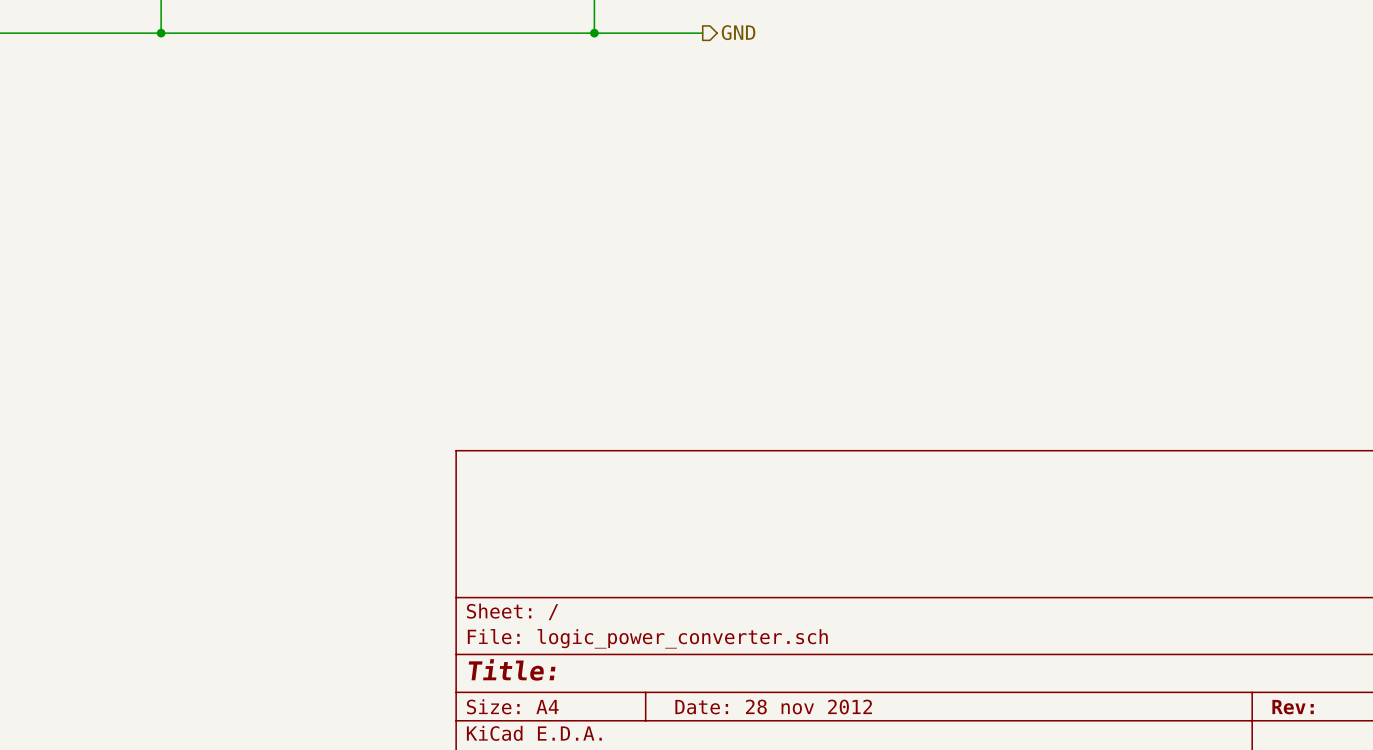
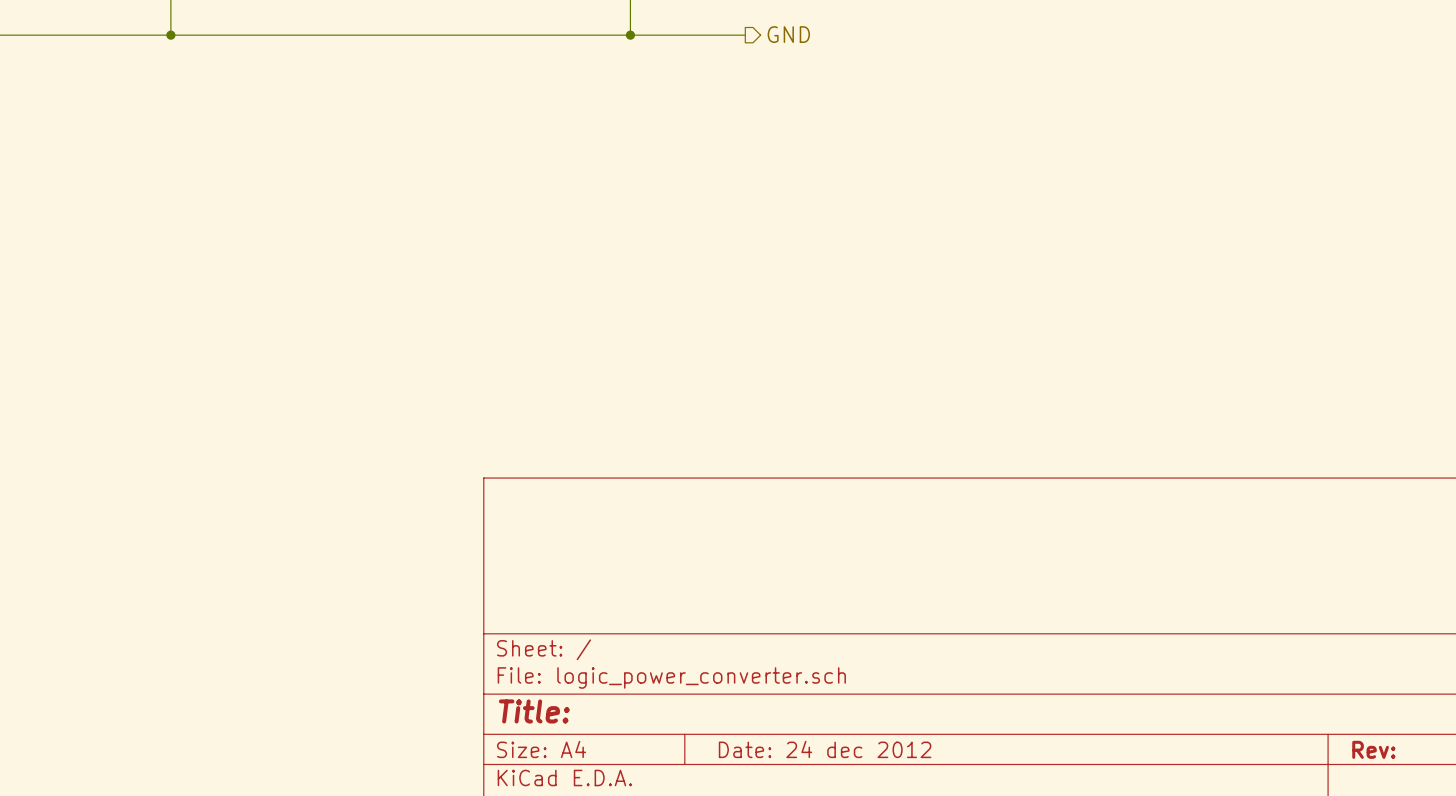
title block: Date: 28 nov 2012 (773, 707) -> Date: 24 dec 2012 (825, 749)

